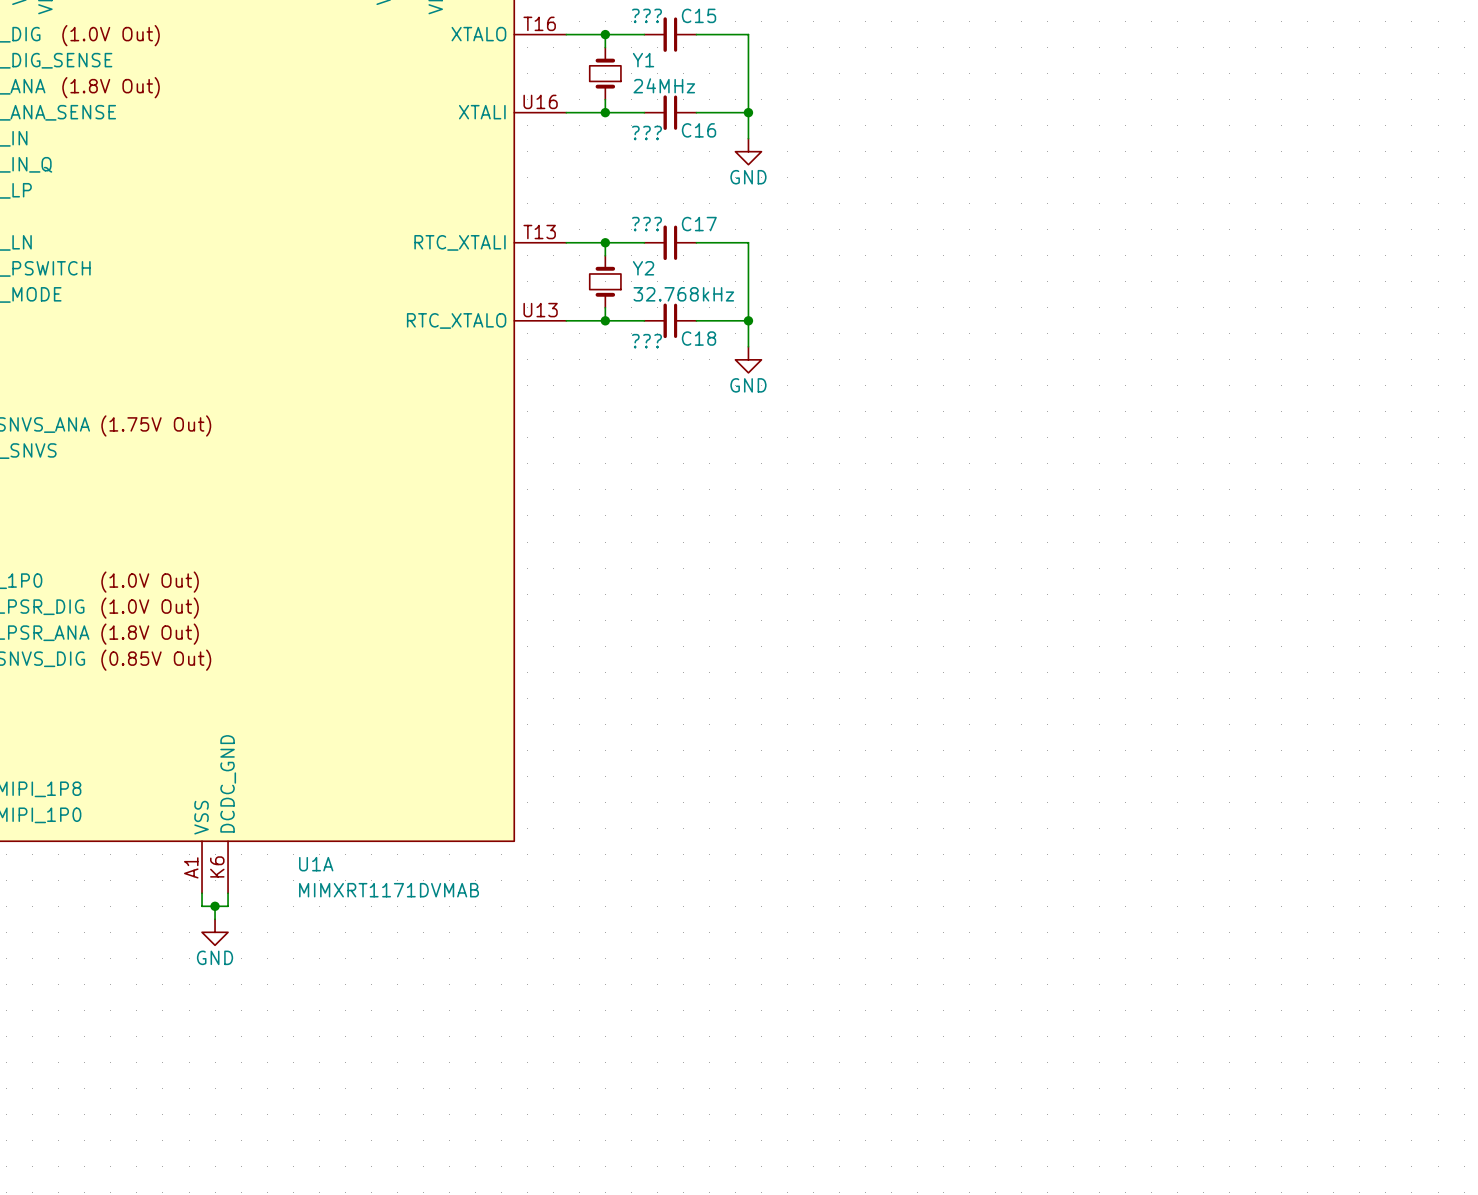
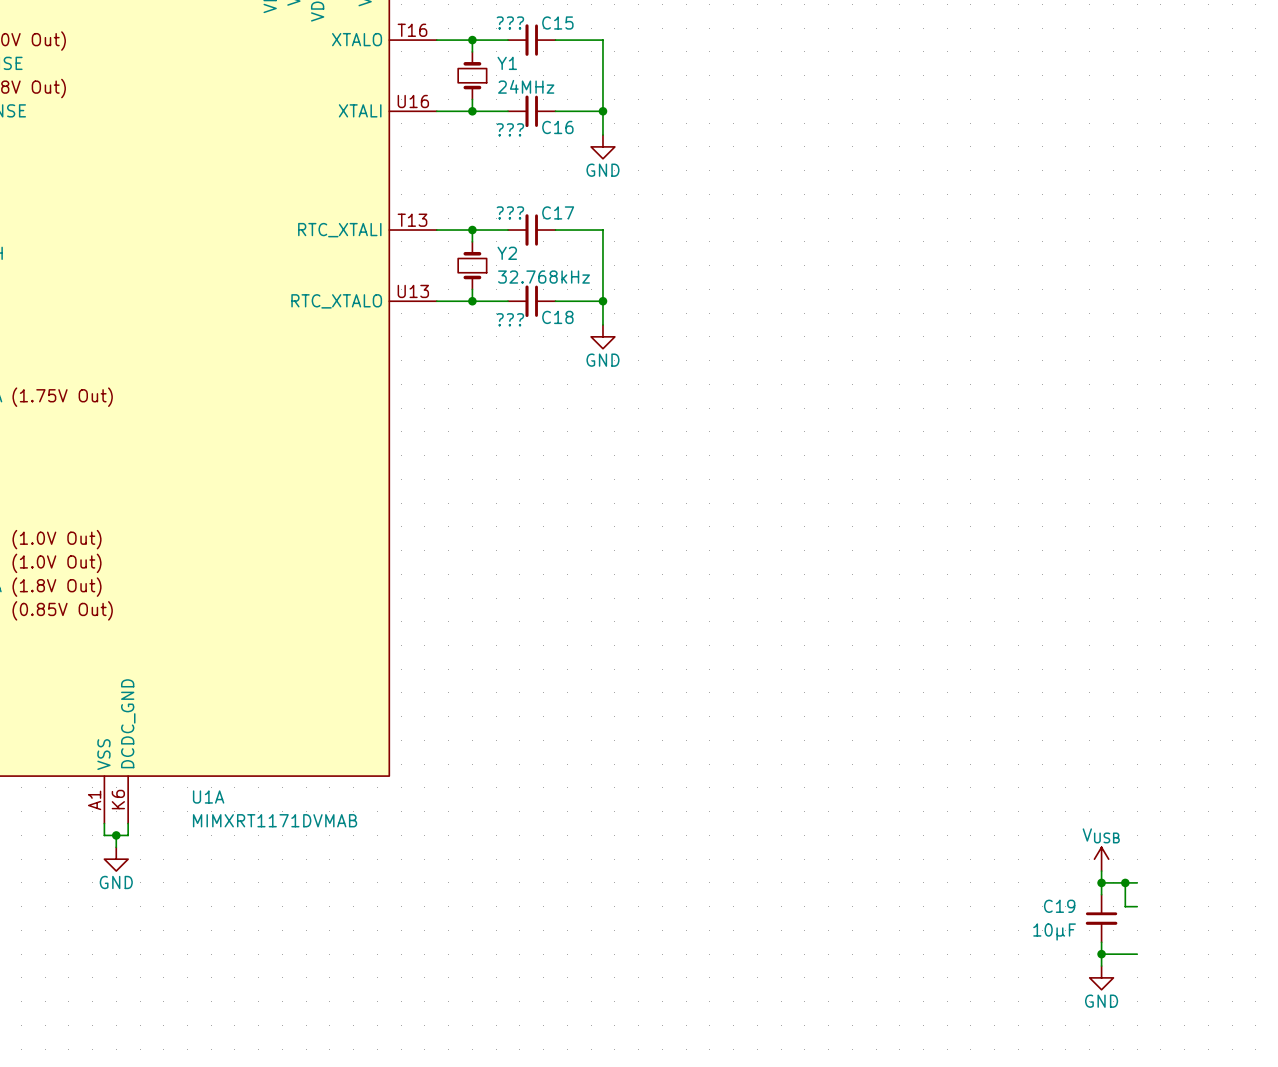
power symbol: none -> VUSB (1101, 859)
wire: none -> (1101, 871) (1101, 894)
wire: none -> (1101, 882) (1137, 882)
junction: none -> (1101, 882)
wire: none -> (1125, 882) (1125, 906) (1137, 906)
junction: none -> (1125, 882)
C19: none -> 10μF (1101, 918)
wire: none -> (1101, 942) (1101, 966)
wire: none -> (1101, 954) (1137, 954)
junction: none -> (1101, 954)
power symbol: none -> GND (1101, 977)

